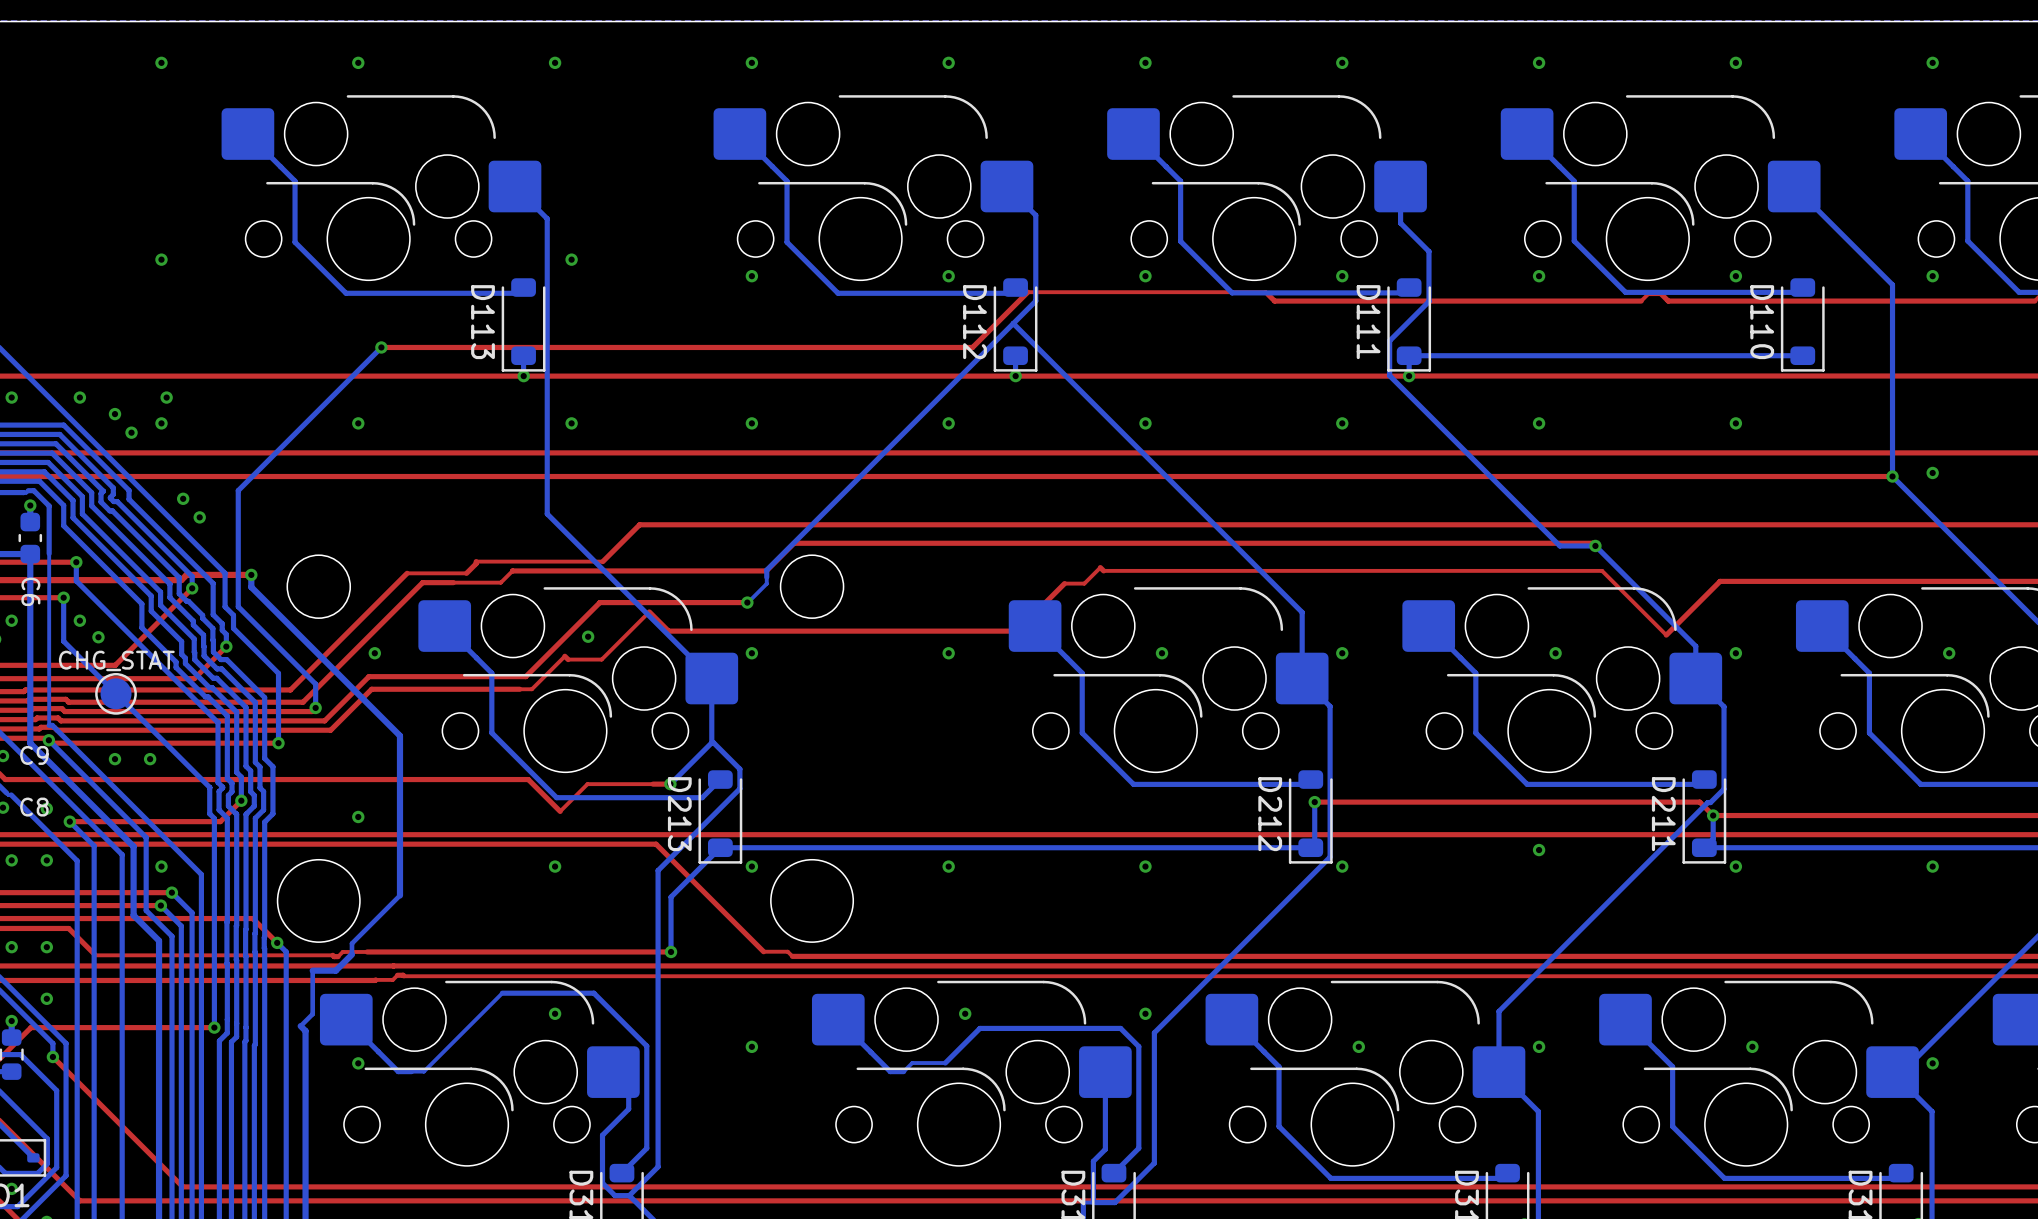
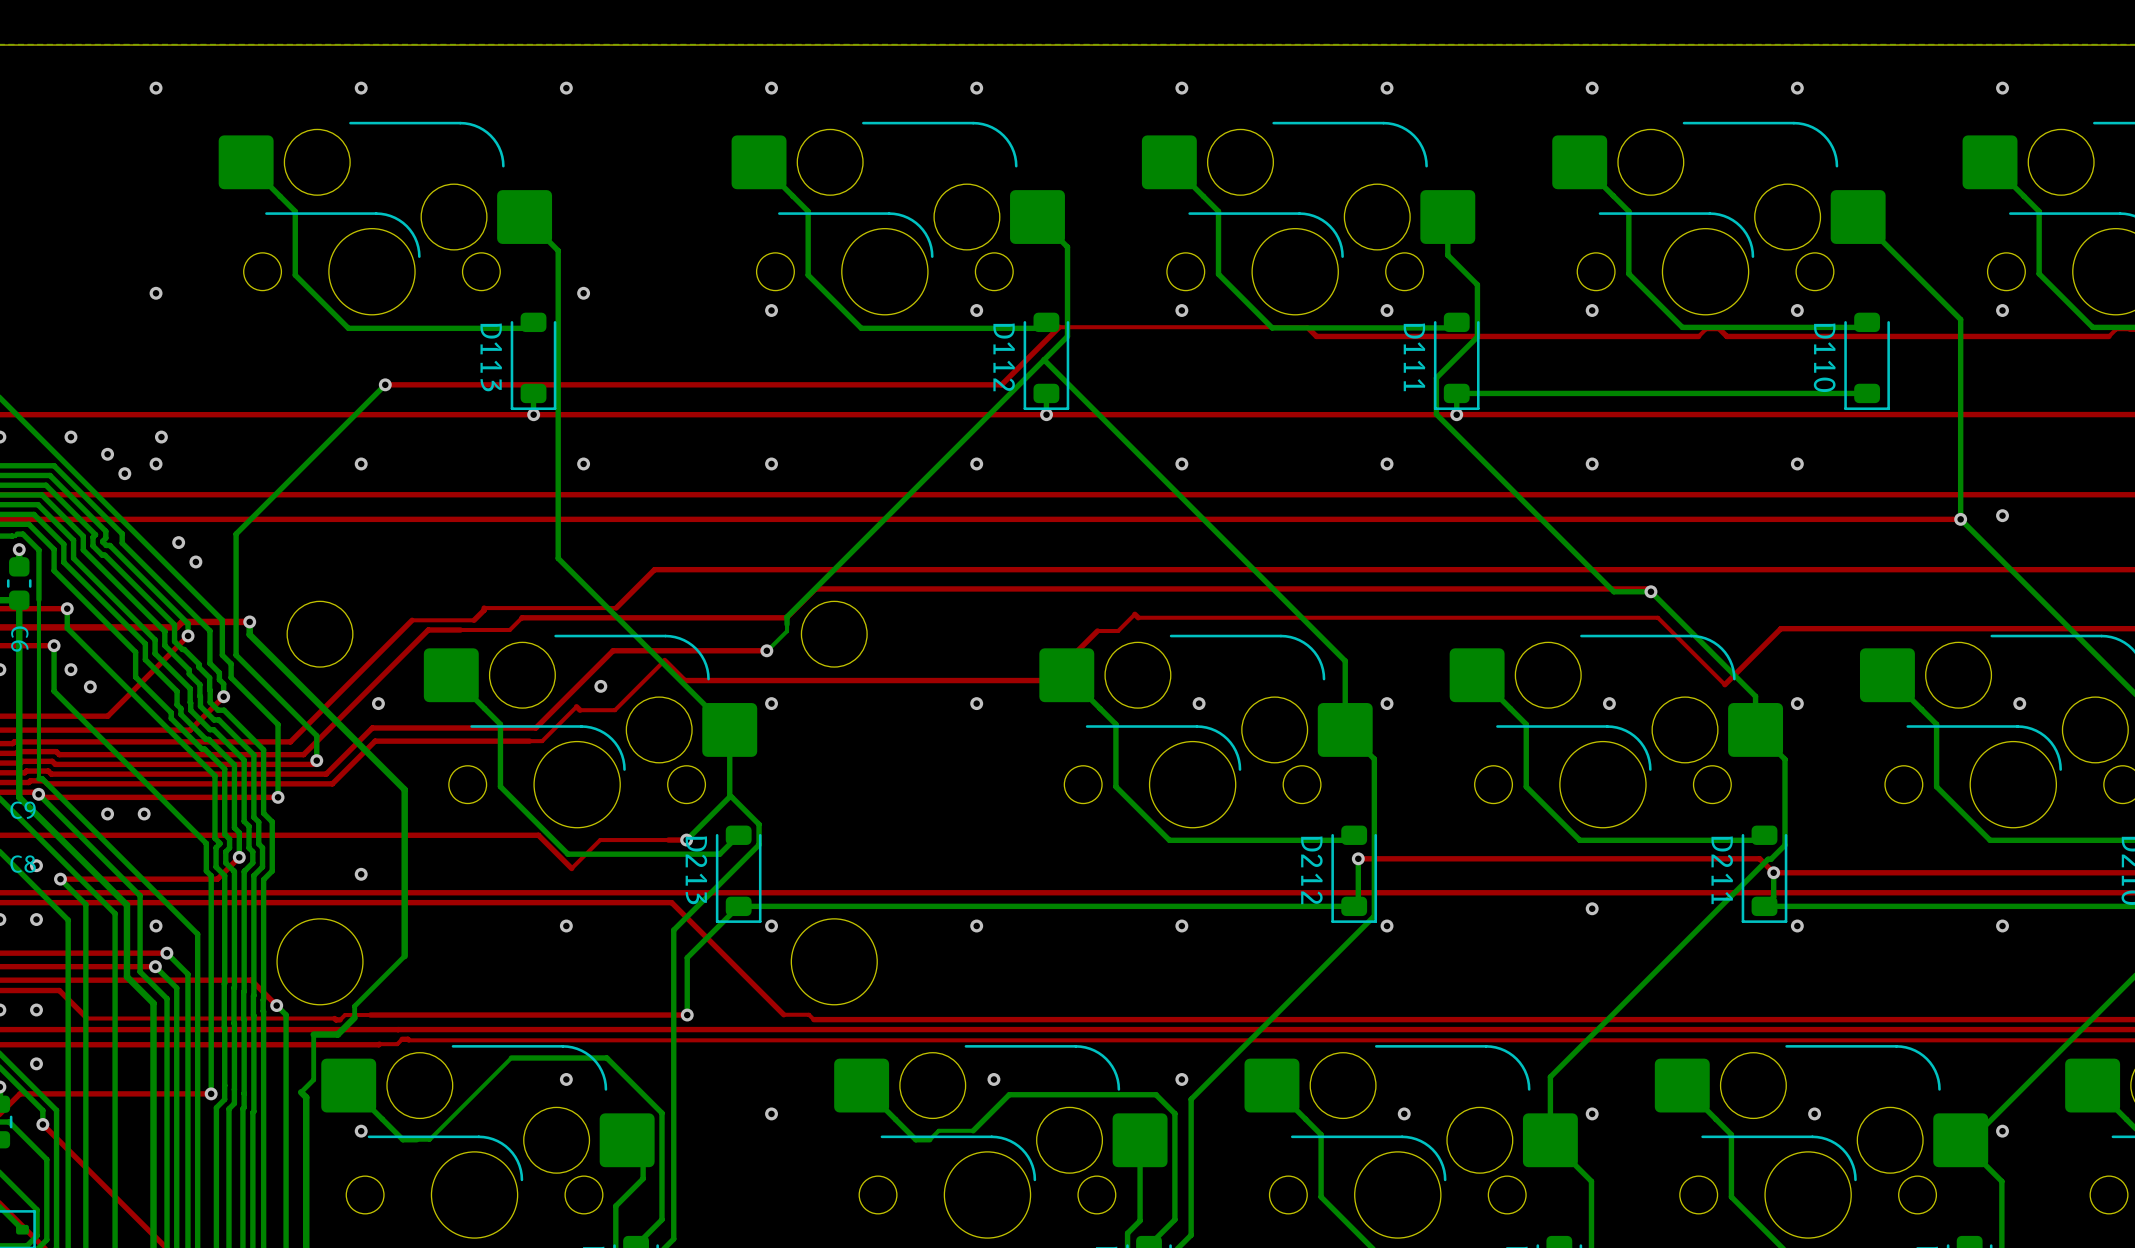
part: CHG_STAT (116, 693) -> none

